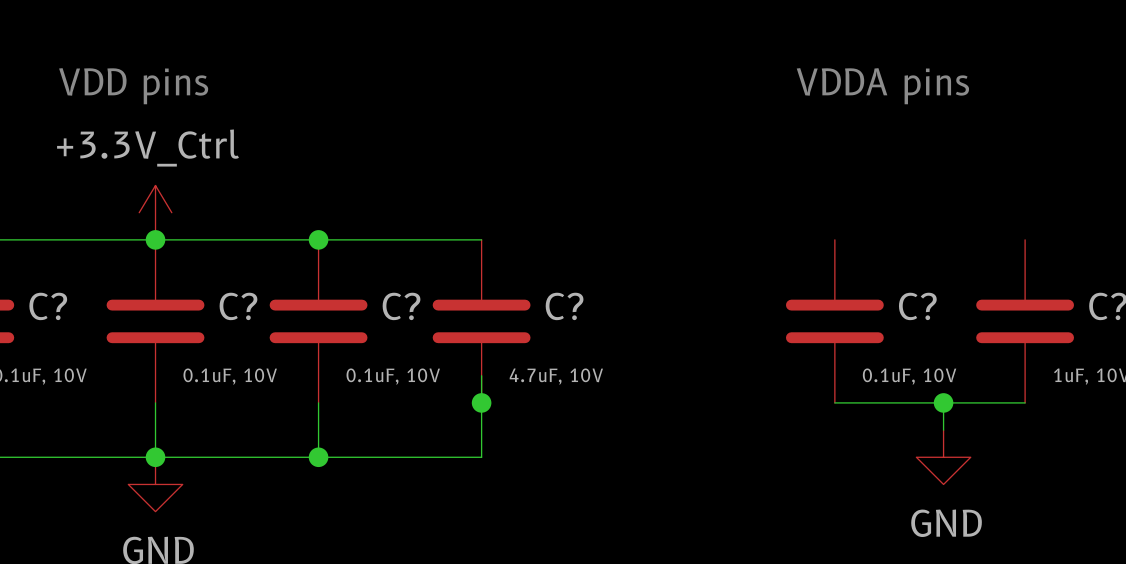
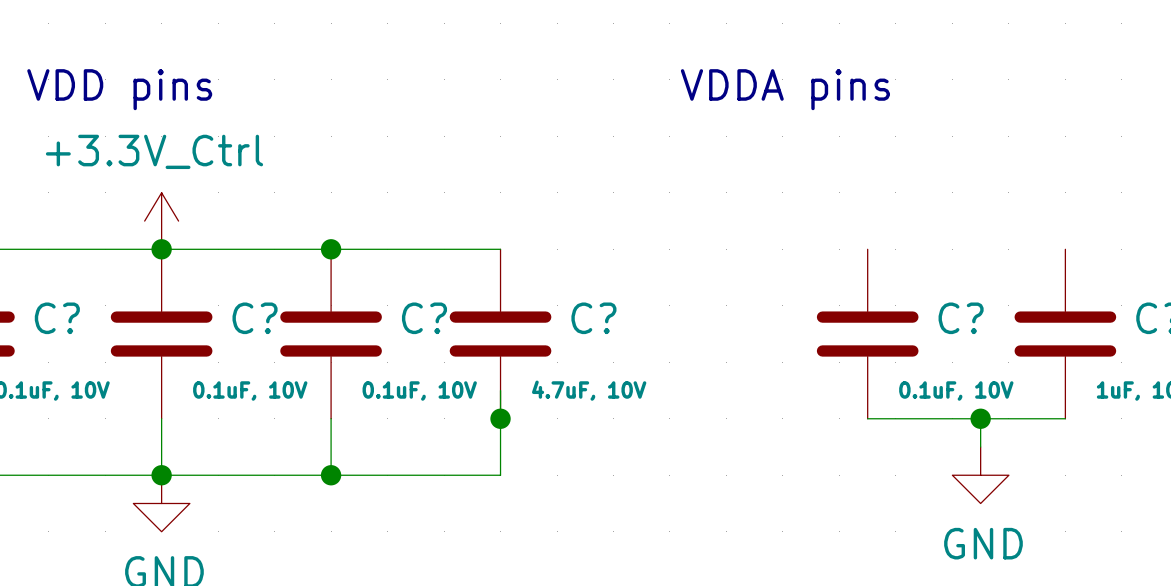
text position: VDDA pins (882, 86) -> VDDA pins (785, 89)

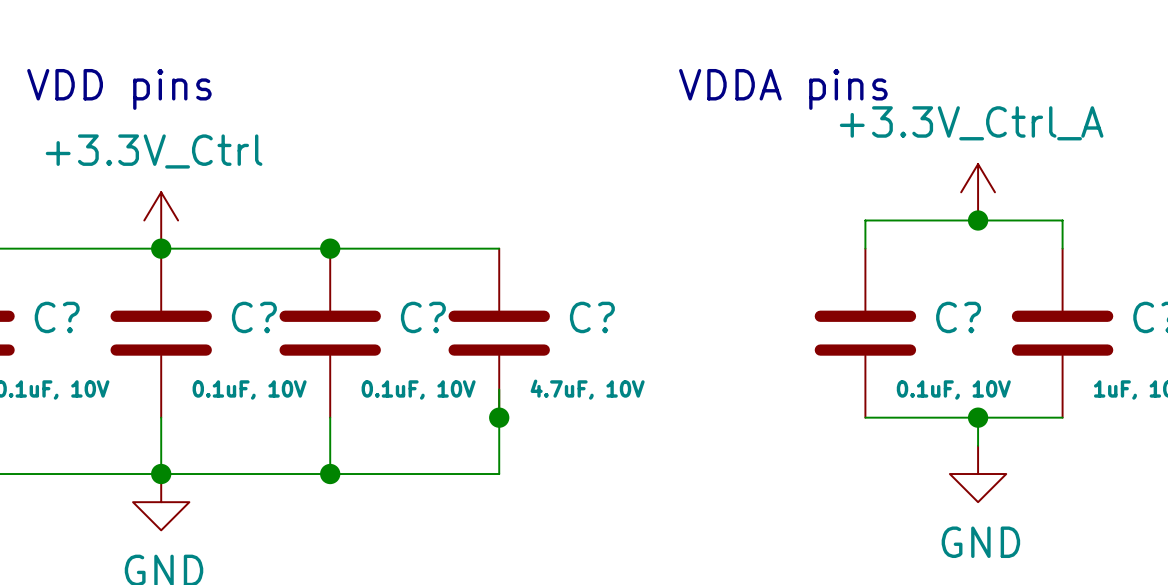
power symbol: none -> +3.3V_Ctrl_A (978, 192)
junction: none -> (978, 220)
wire: none -> (865, 248) (865, 220) (1062, 220) (1062, 248)

